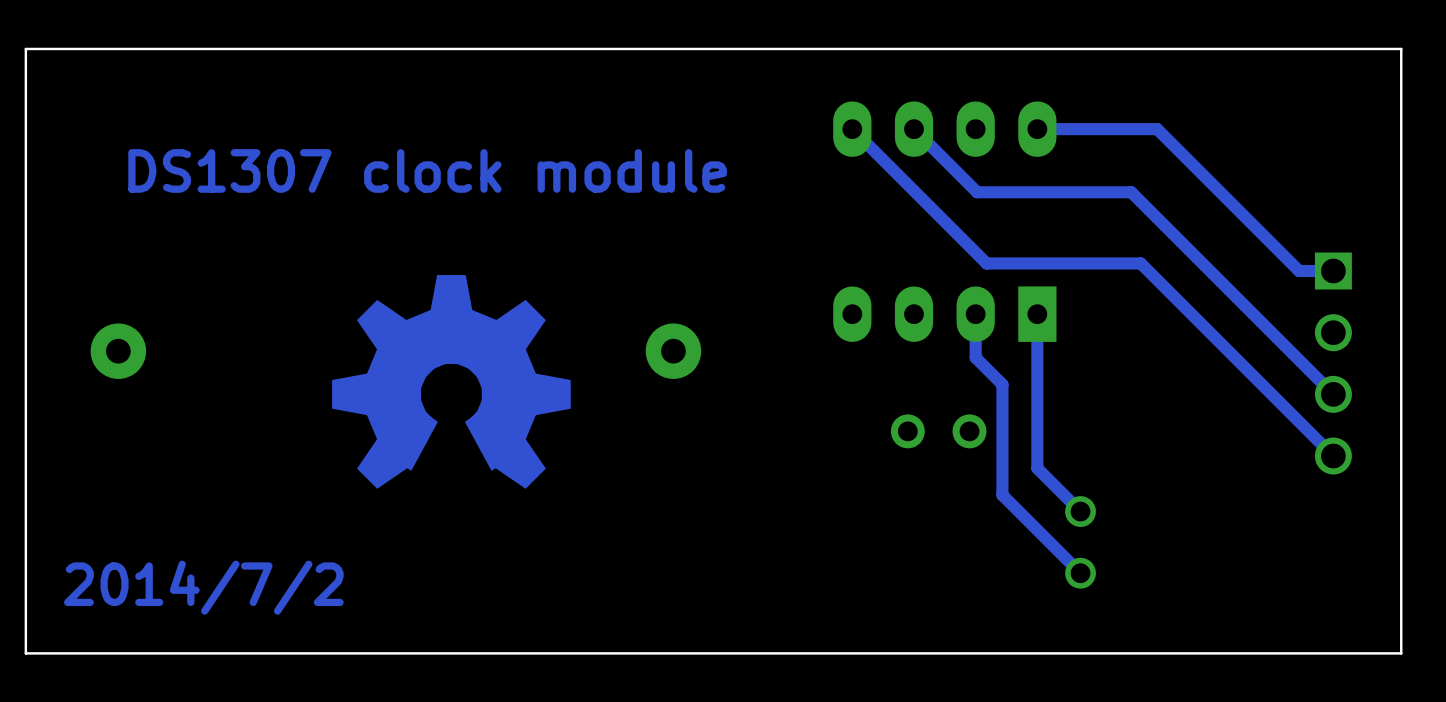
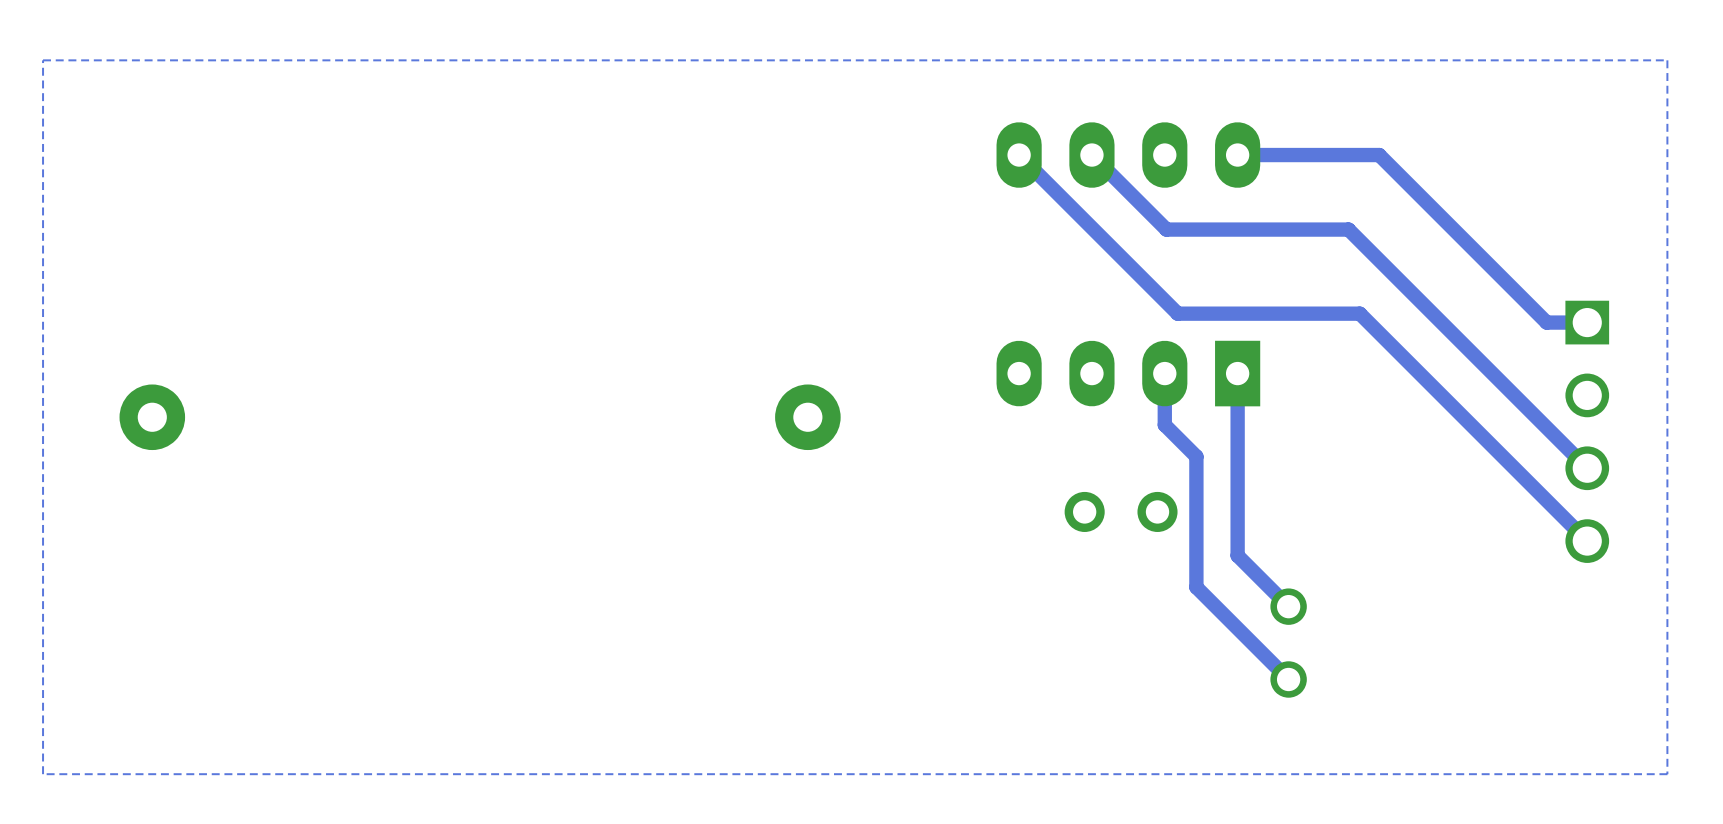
board edge: (1401, 48) (25, 48) (25, 653) (1401, 653) (1401, 48) -> none
text: DS1307 clock module (427, 170) -> none
part: (451, 381) -> none
text: 2014/7/2 (203, 587) -> none

